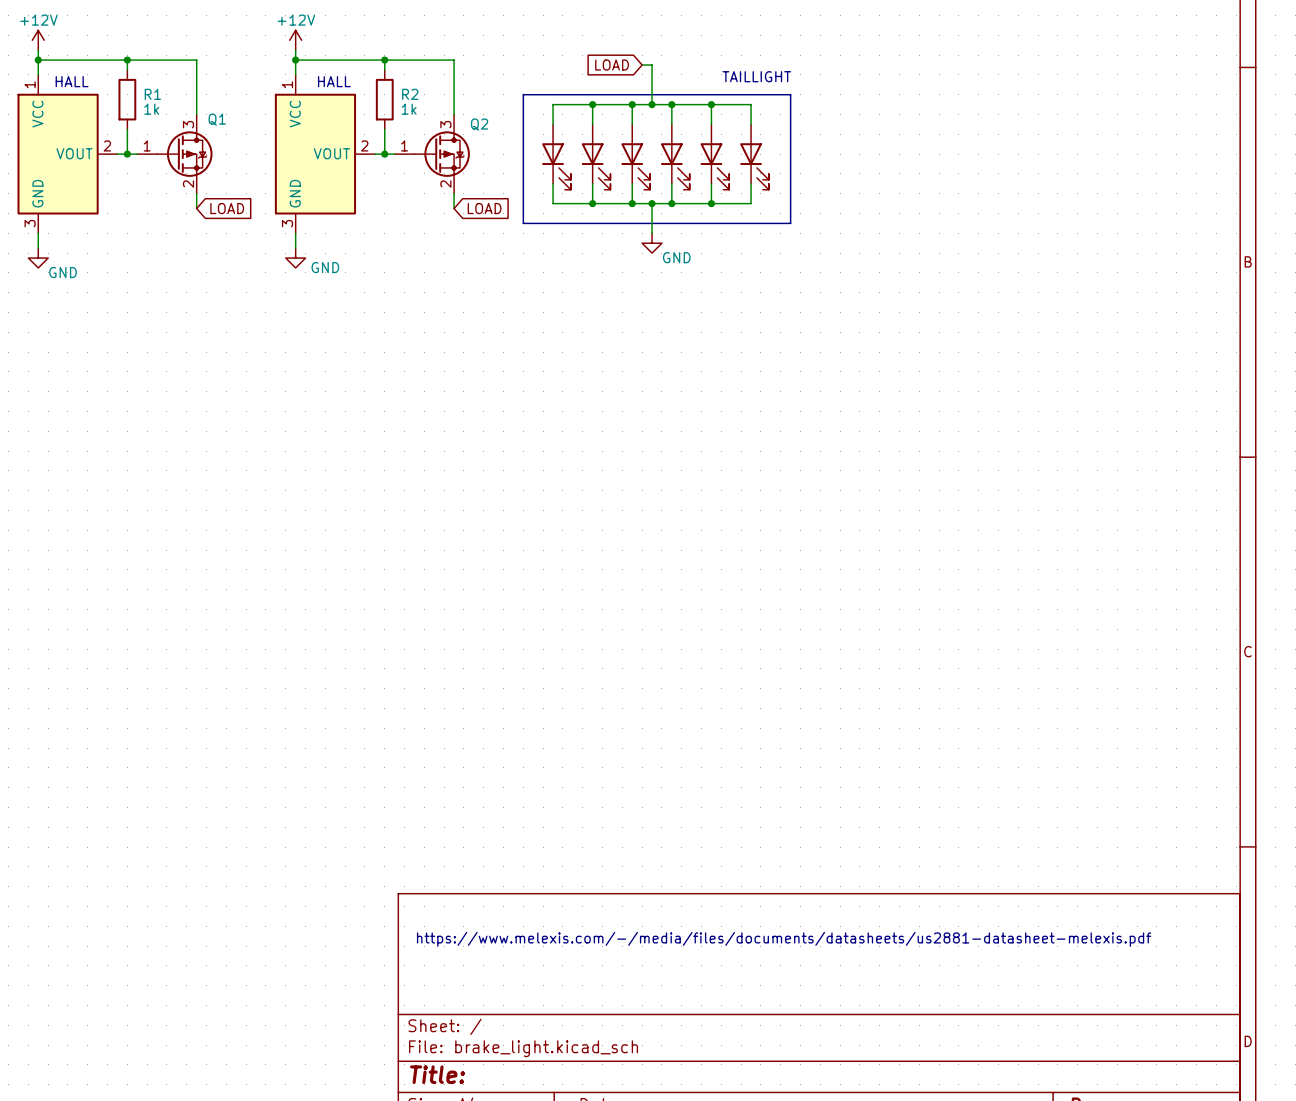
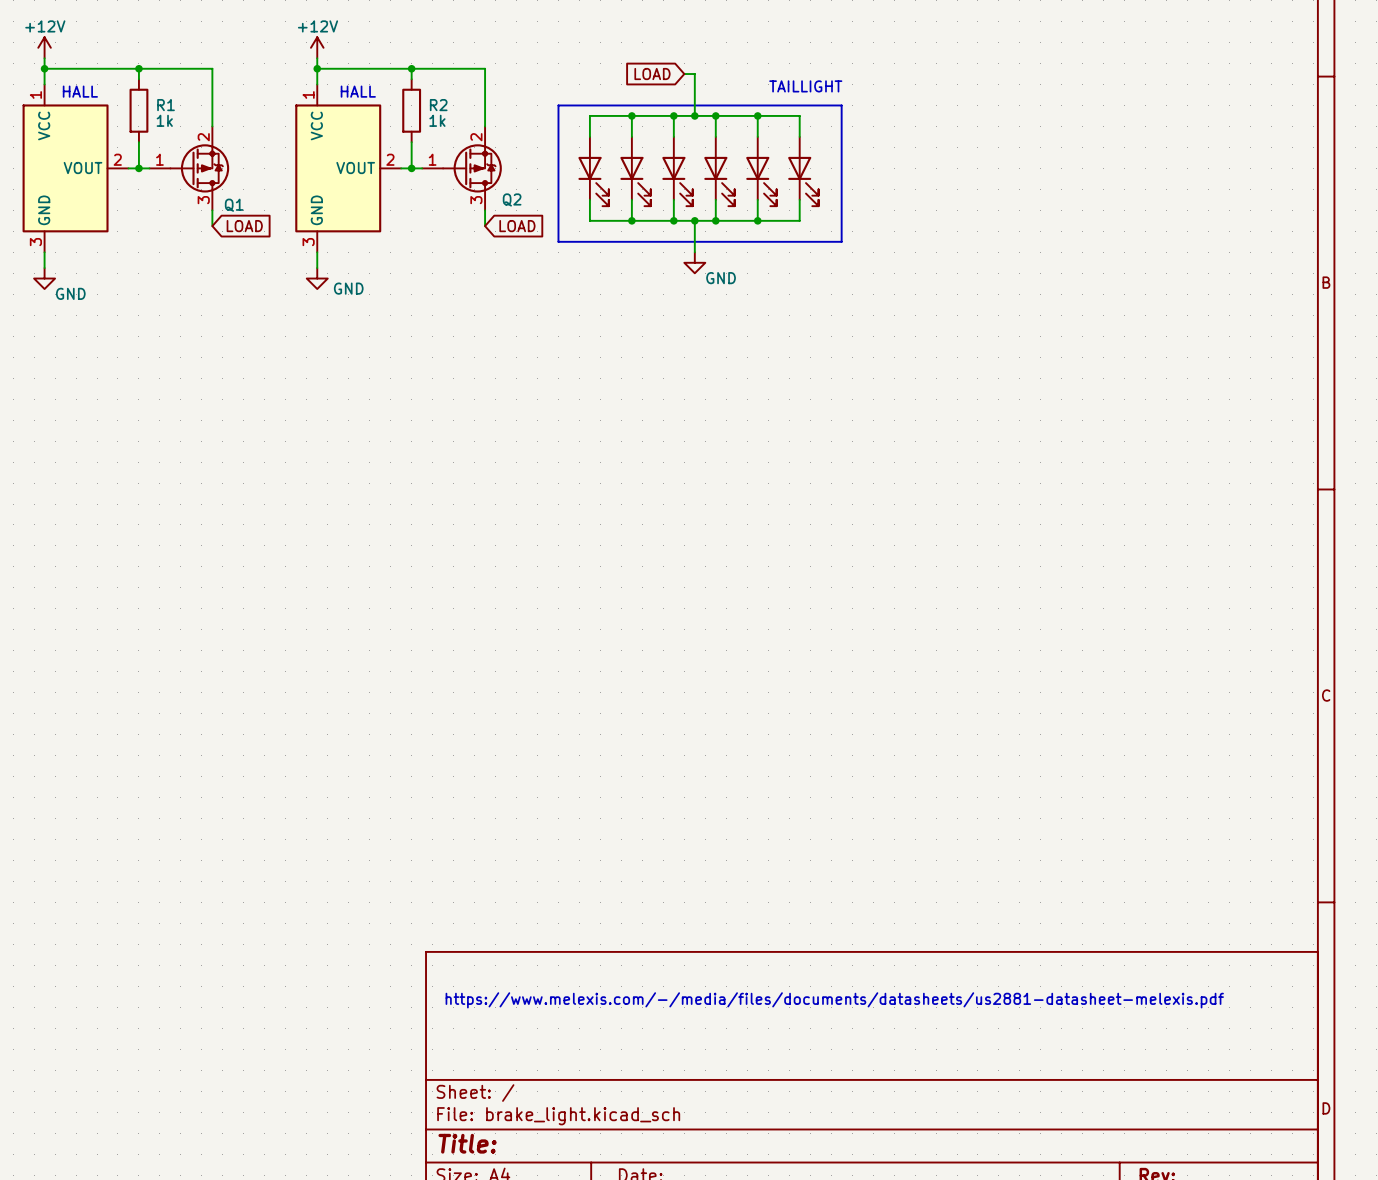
Q1 flip: as is (184, 154) -> up-down (199, 168)
Q2 flip: as is (442, 154) -> up-down (472, 168)

